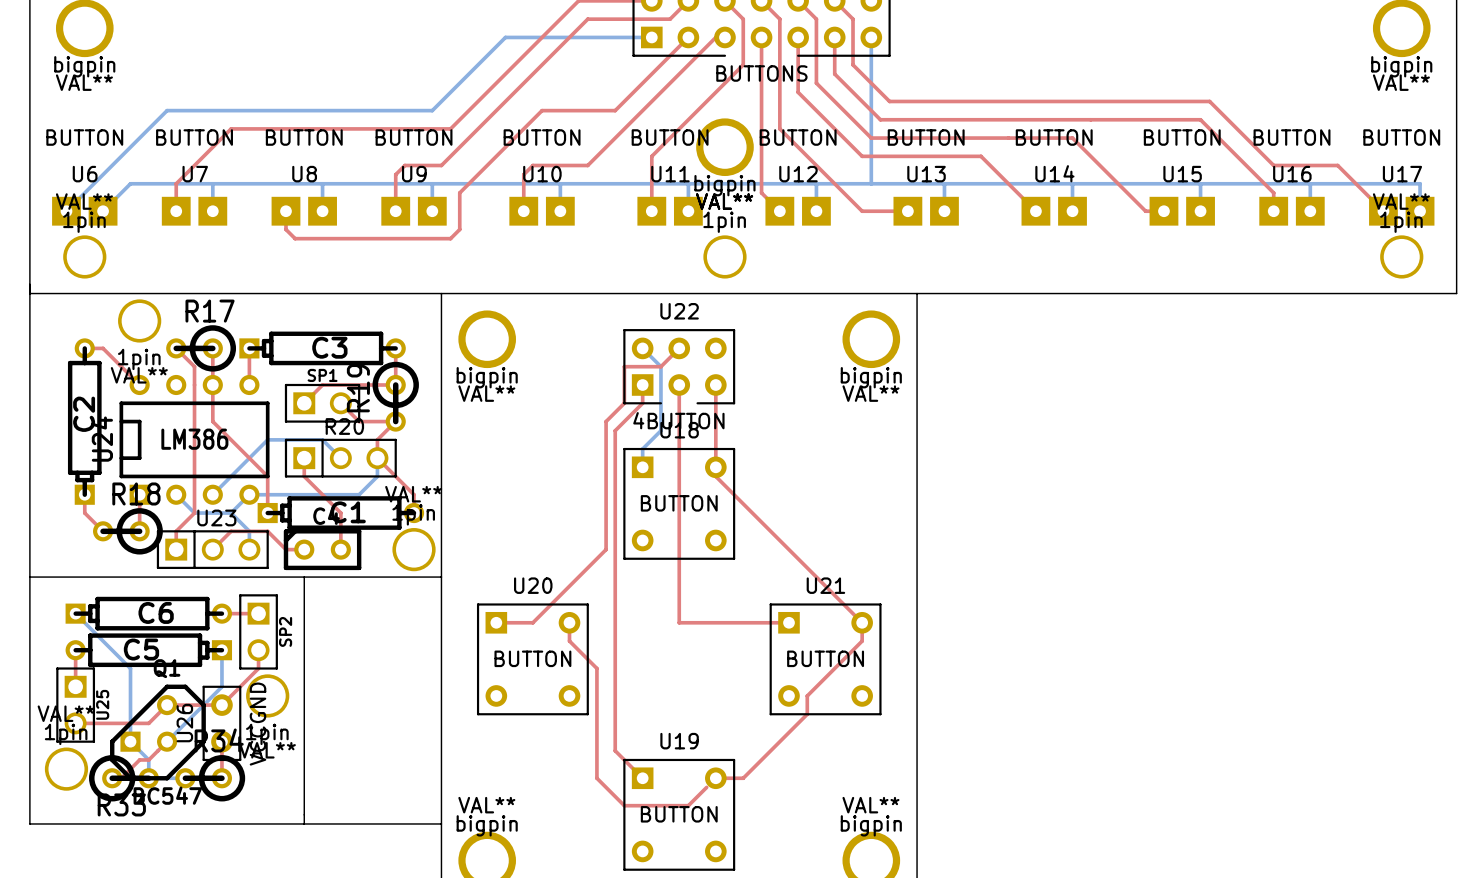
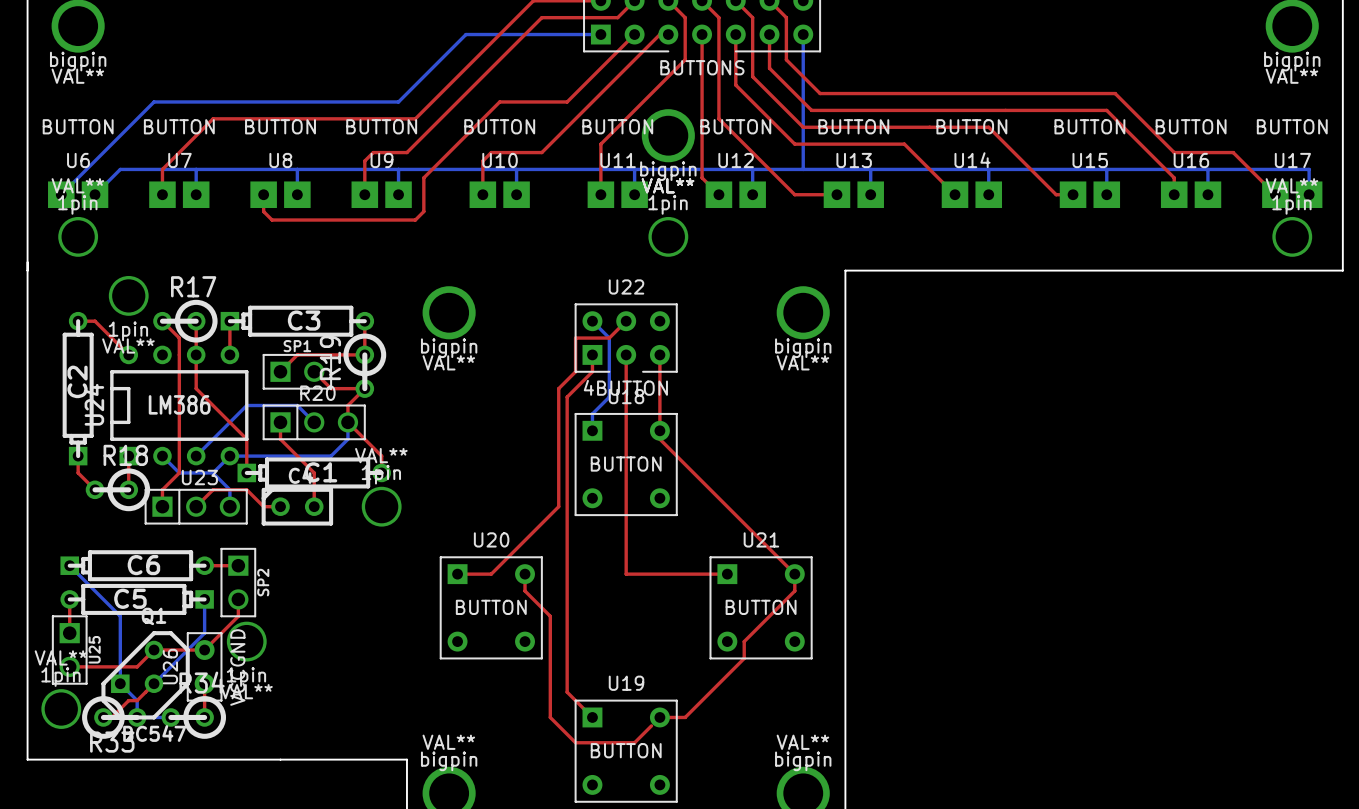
board edge: (29, 293) (917, 293) -> none
board edge: (441, 293) (441, 823) -> none
board edge: (29, 577) (441, 577) -> none
board edge: (304, 577) (304, 823) -> none

